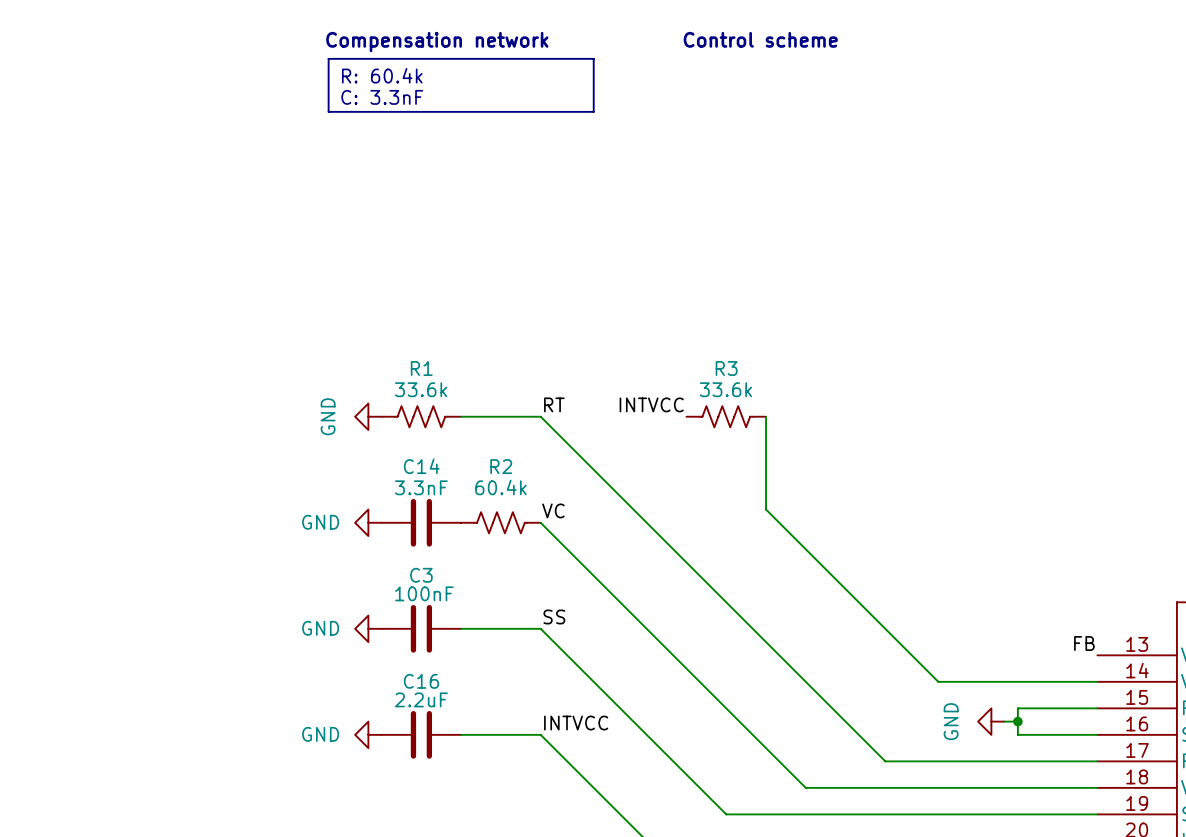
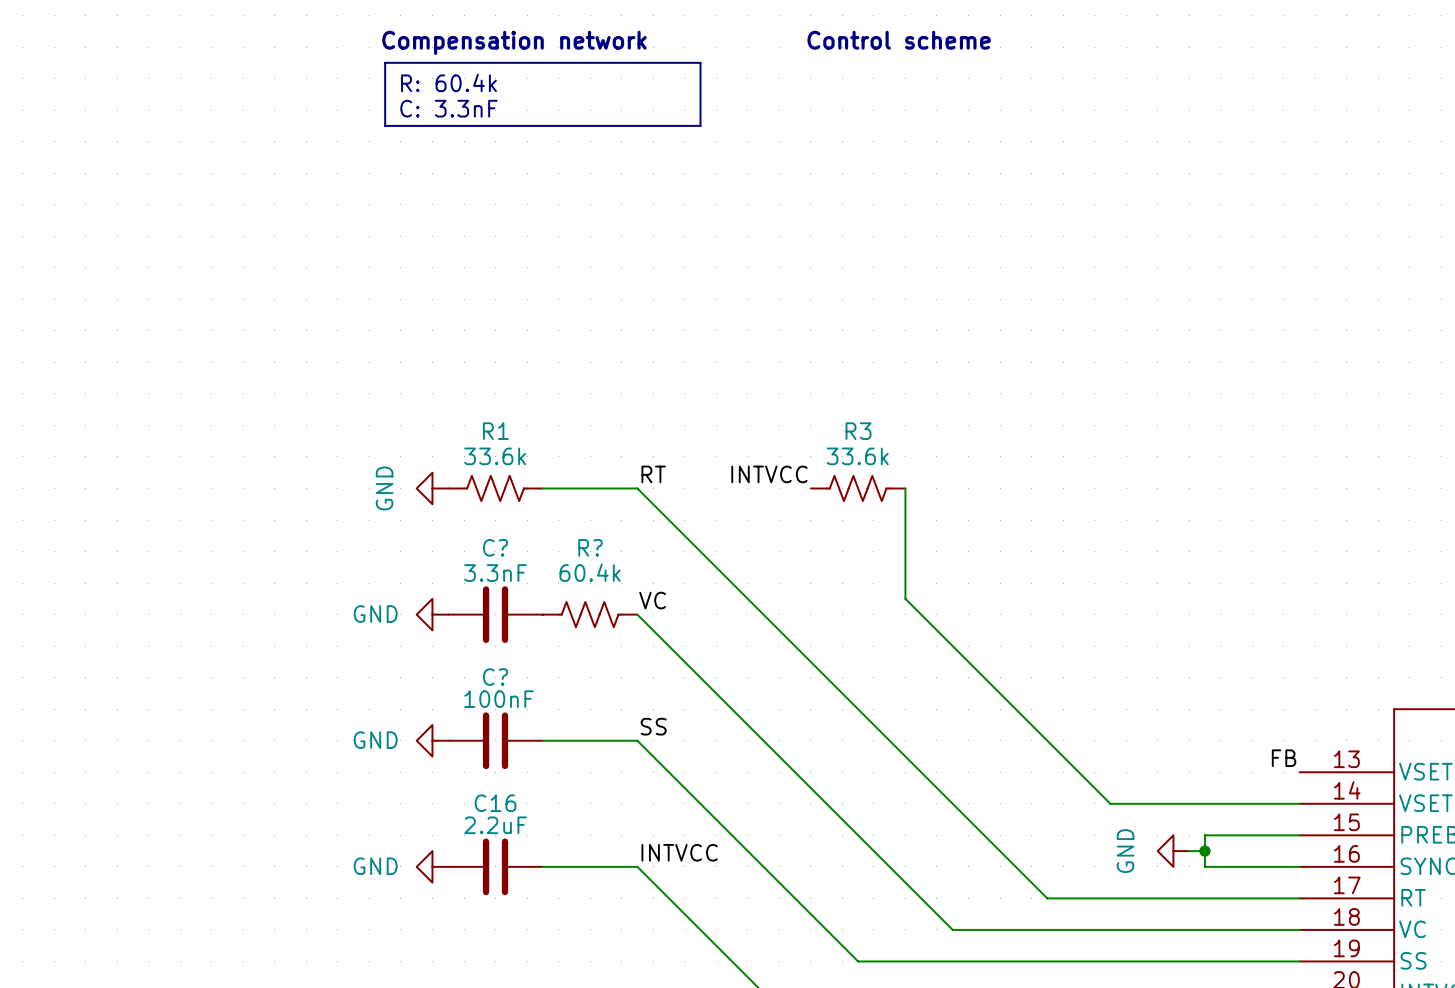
C14 name: C14 (421, 466) -> C? (495, 547)
R2 name: R2 (501, 466) -> R? (590, 547)
C3 name: C3 (421, 575) -> C? (495, 677)

